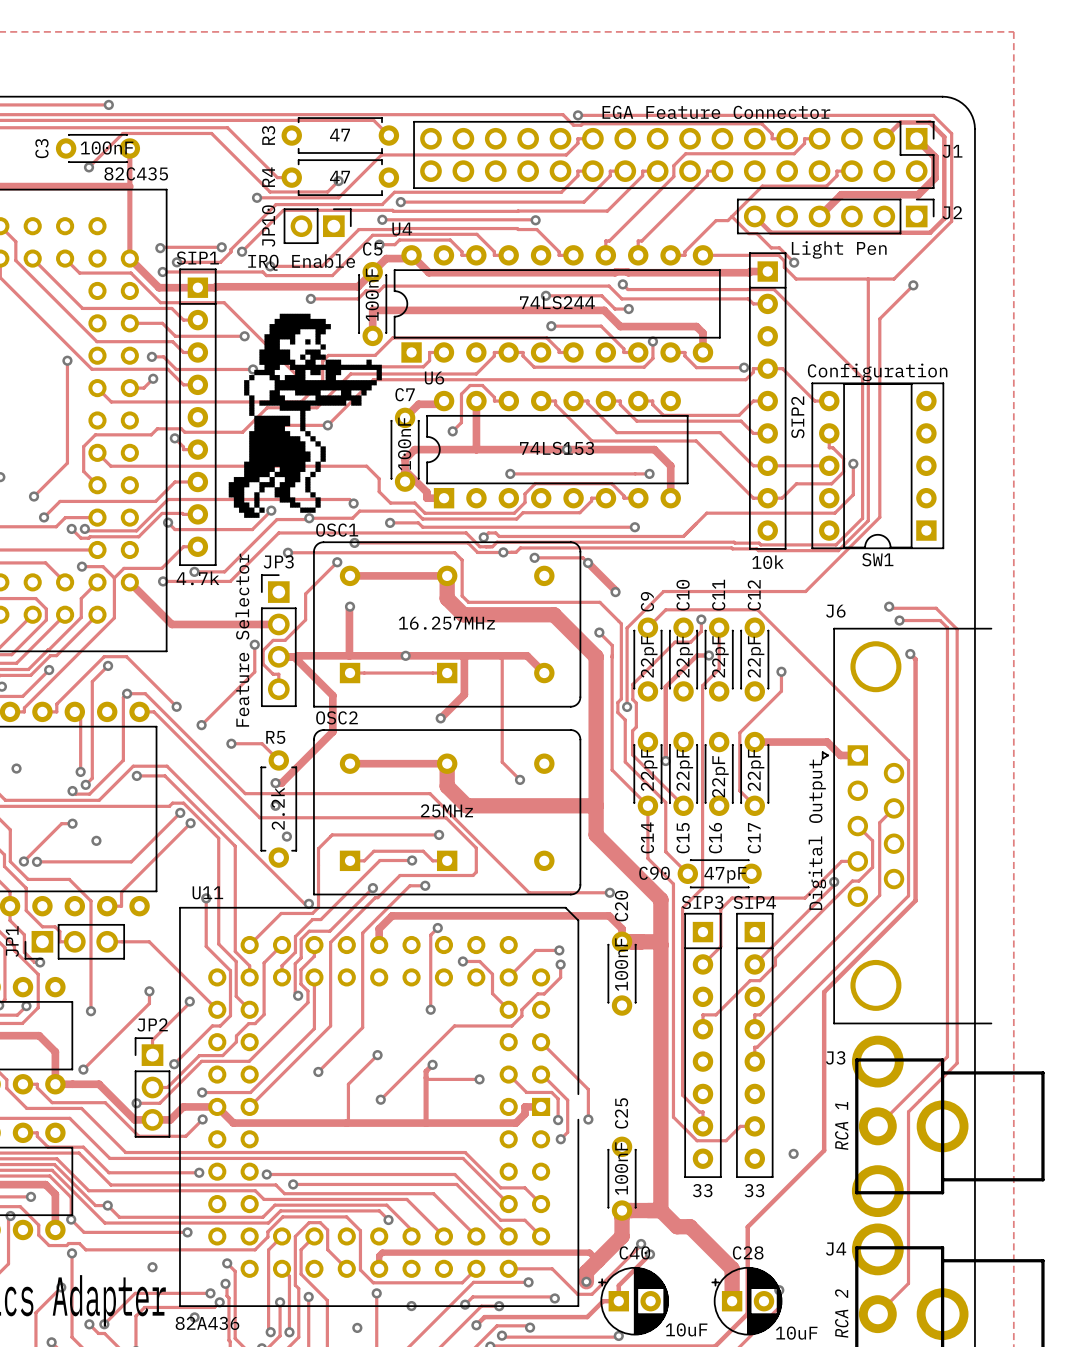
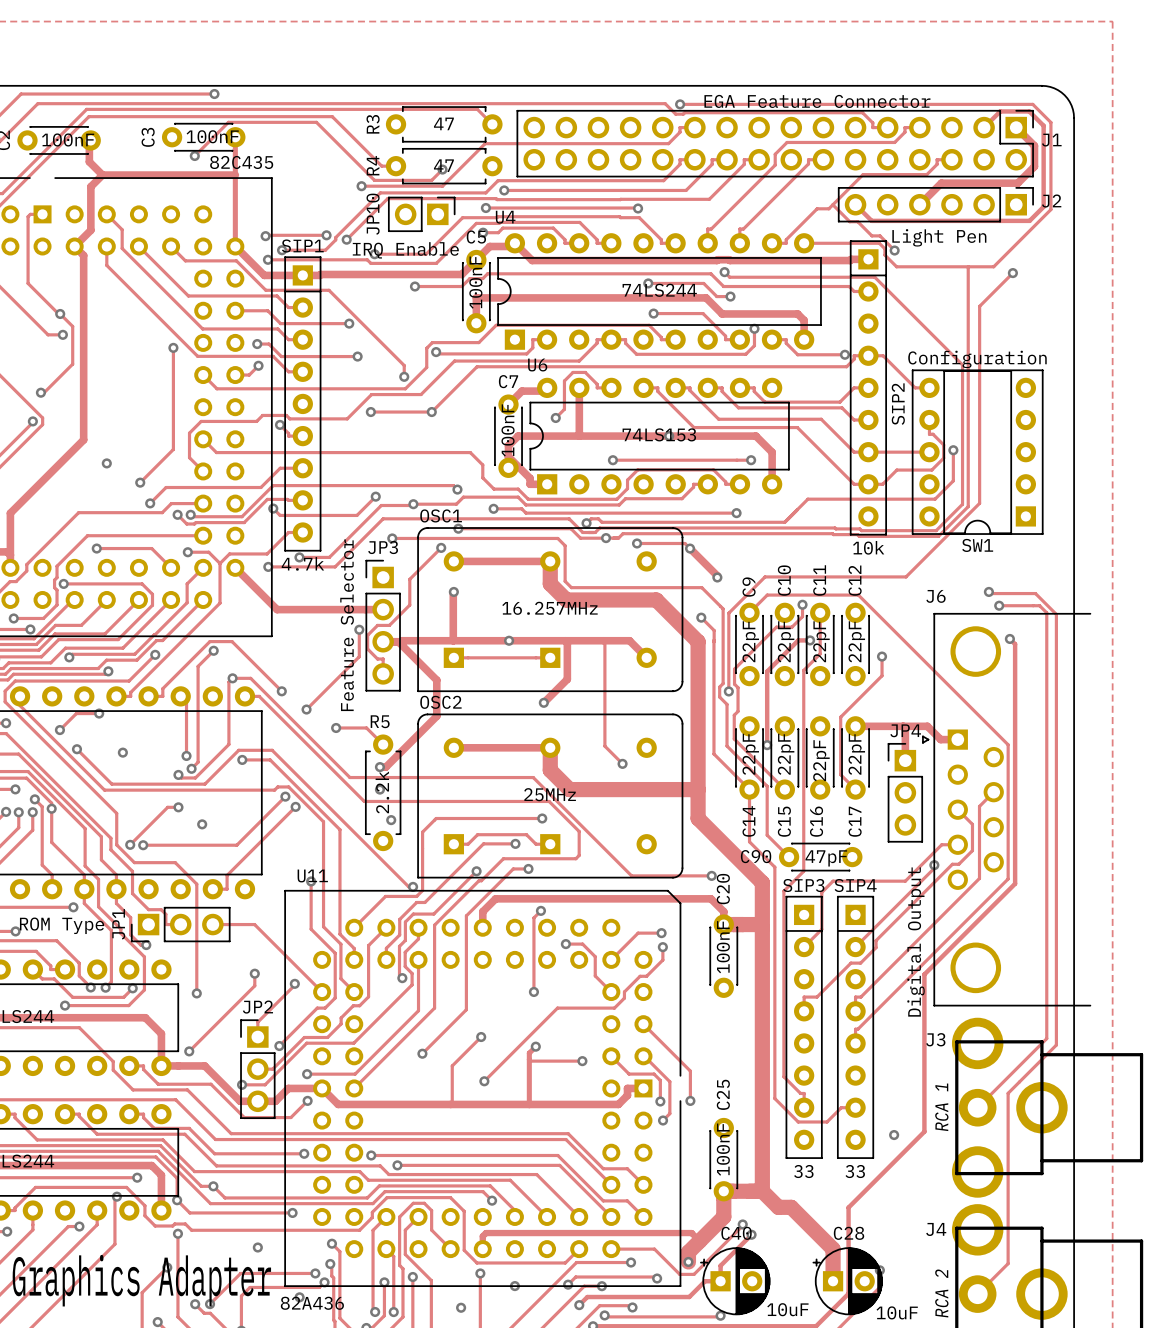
drawing: [228, 313, 382, 518] -> none
track: none -> (903, 726) (905, 728) (905, 760)
JP4: none -> (905, 792)
J6 value position: Digital Output (817, 834) -> Digital Output (916, 942)

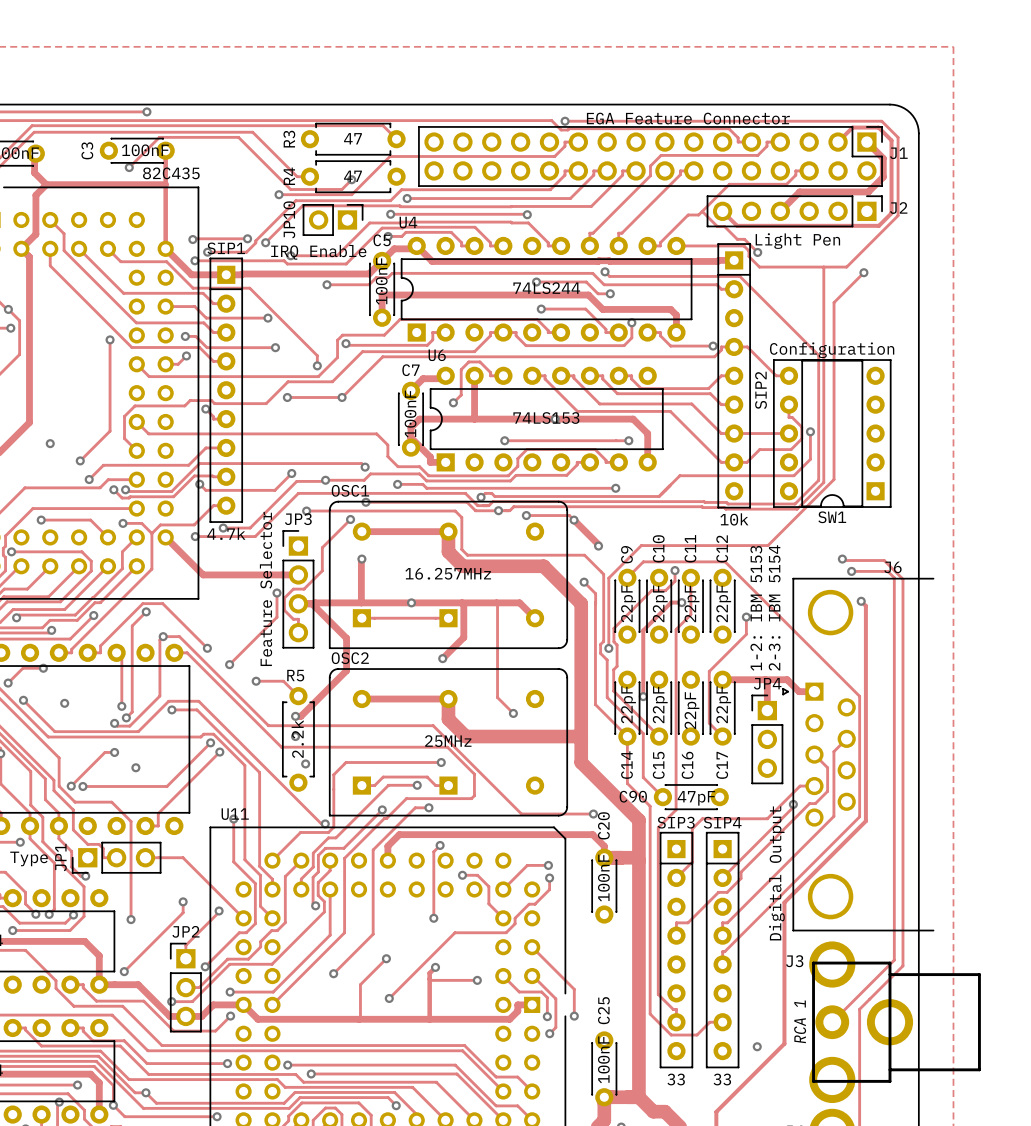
J6 name position: J6 (935, 596) -> J6 (892, 567)
text: none -> 1-2: IBM 5153 (756, 608)
text: none -> 2-3: IBM 5154 (774, 607)

